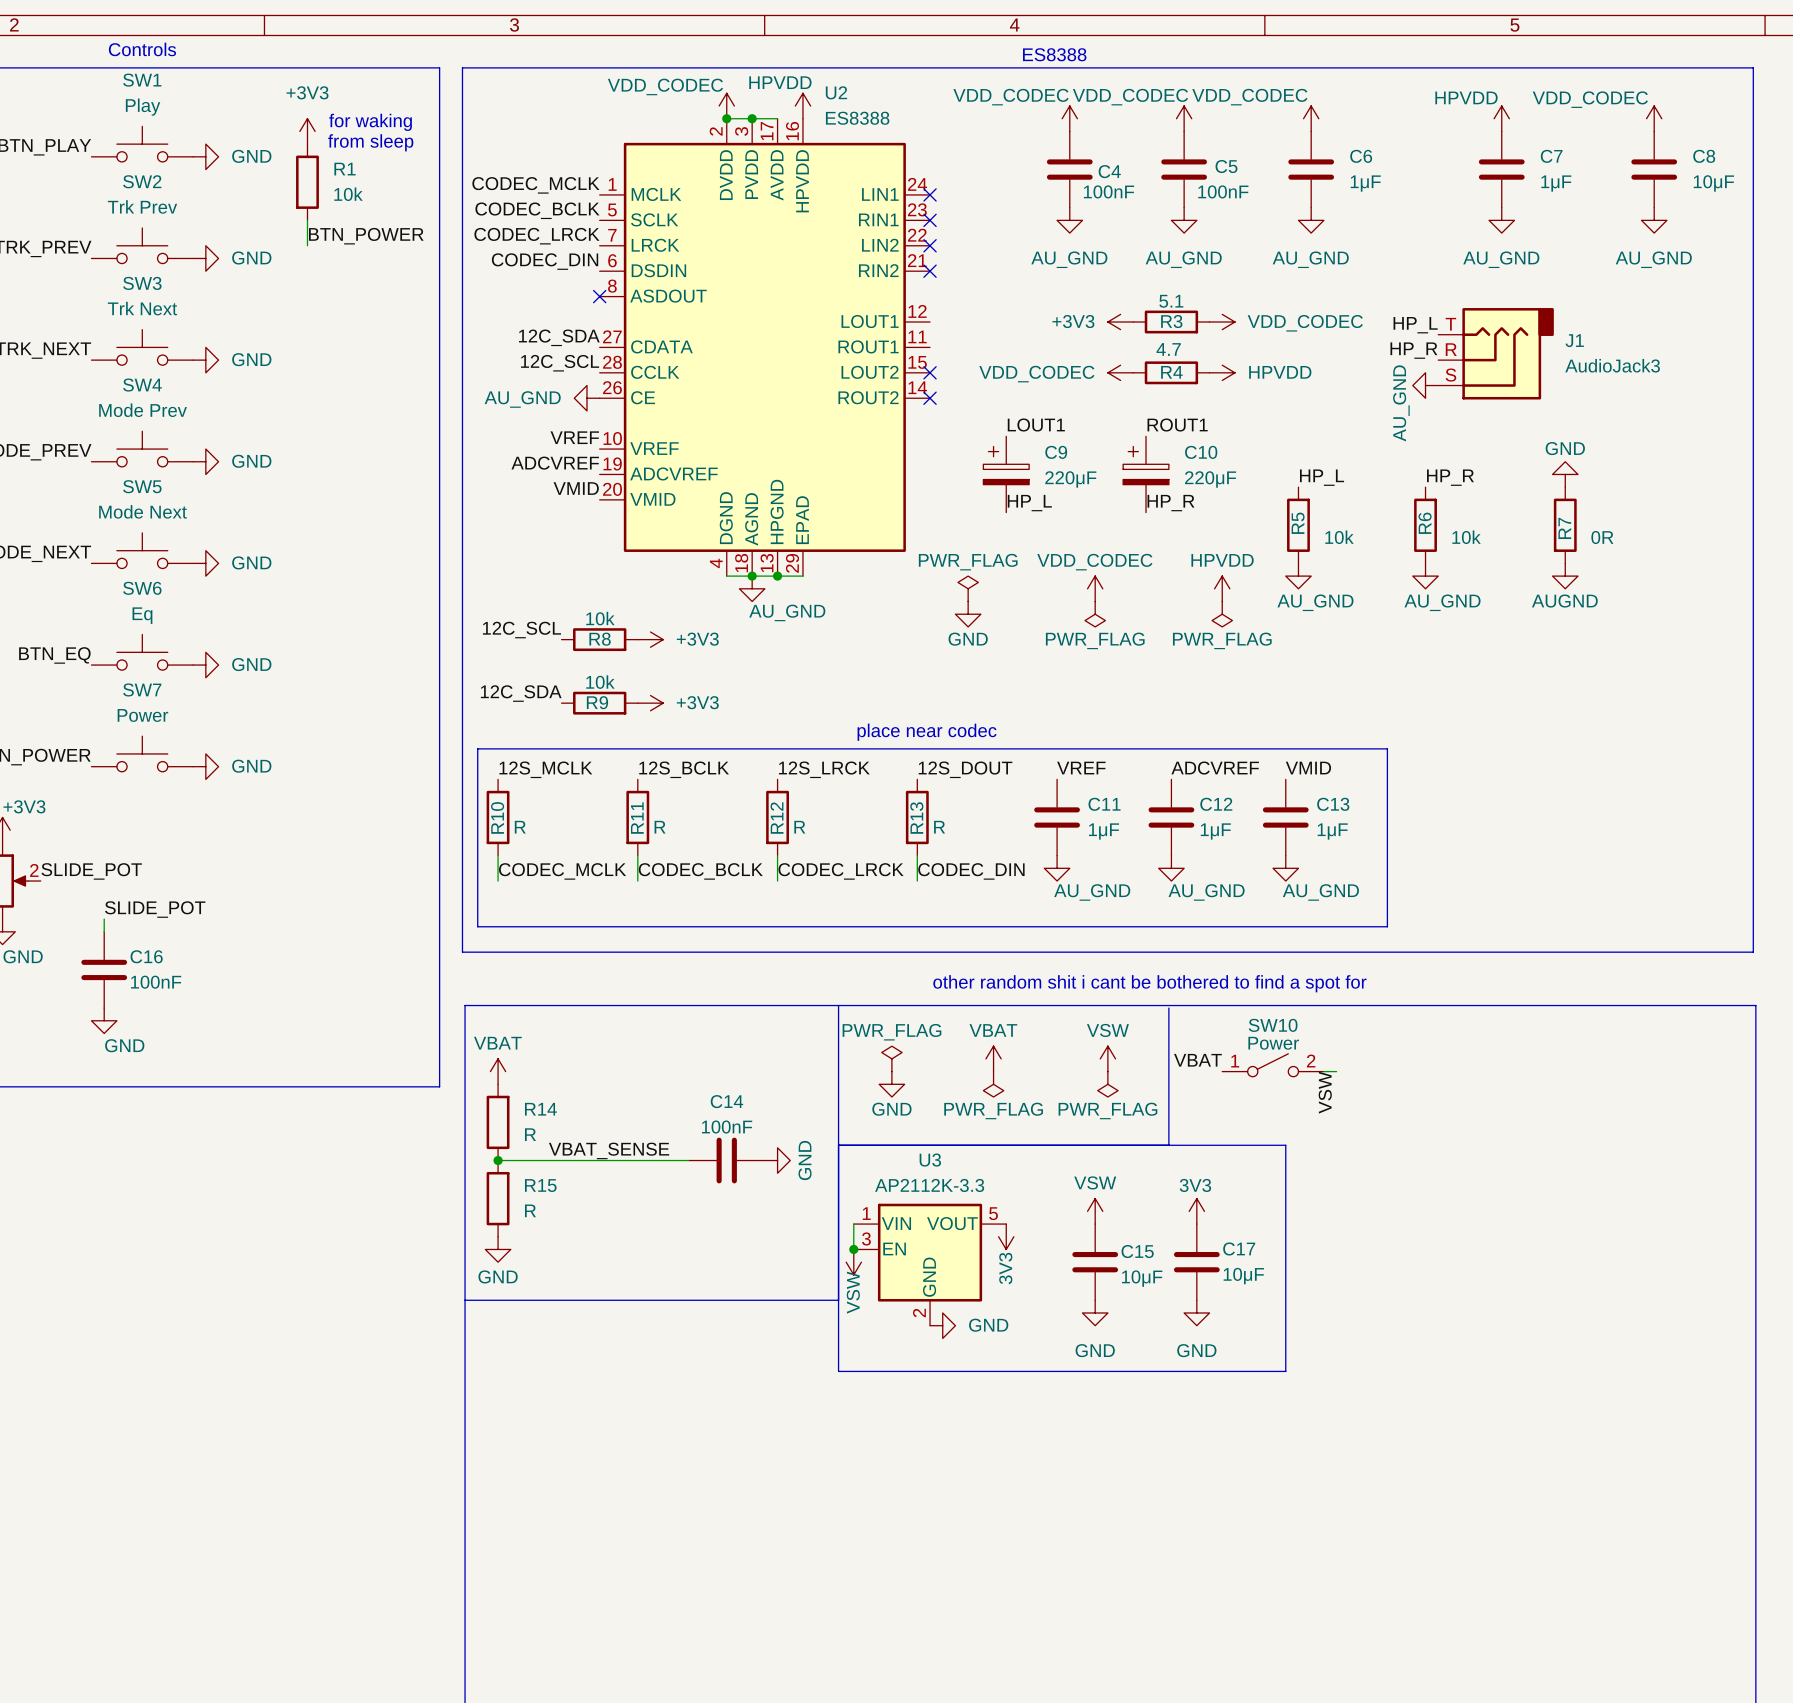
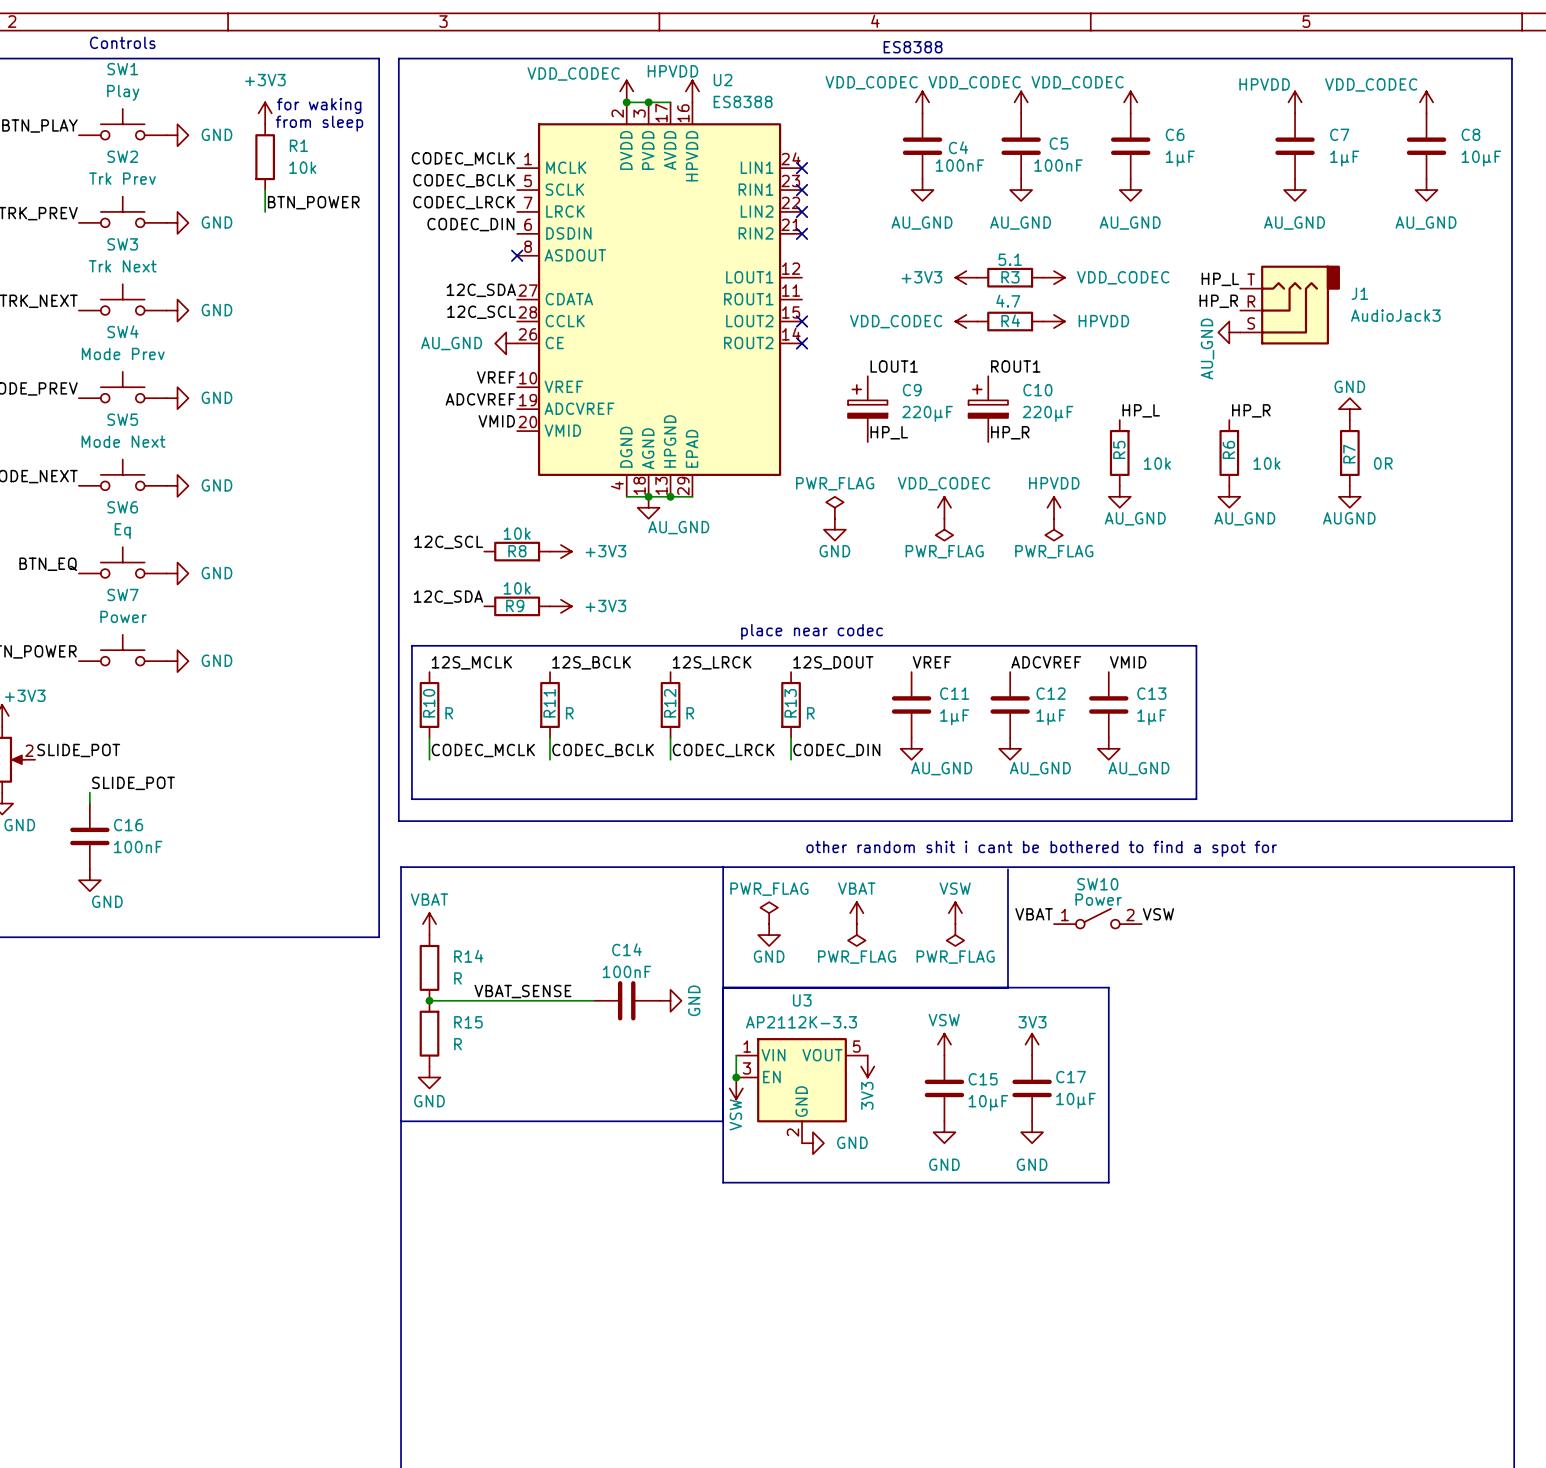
wire: (1323, 1071) (1336, 1071) -> none
label rotation: 0° (1325, 1092) -> 90° clockwise (1158, 914)

